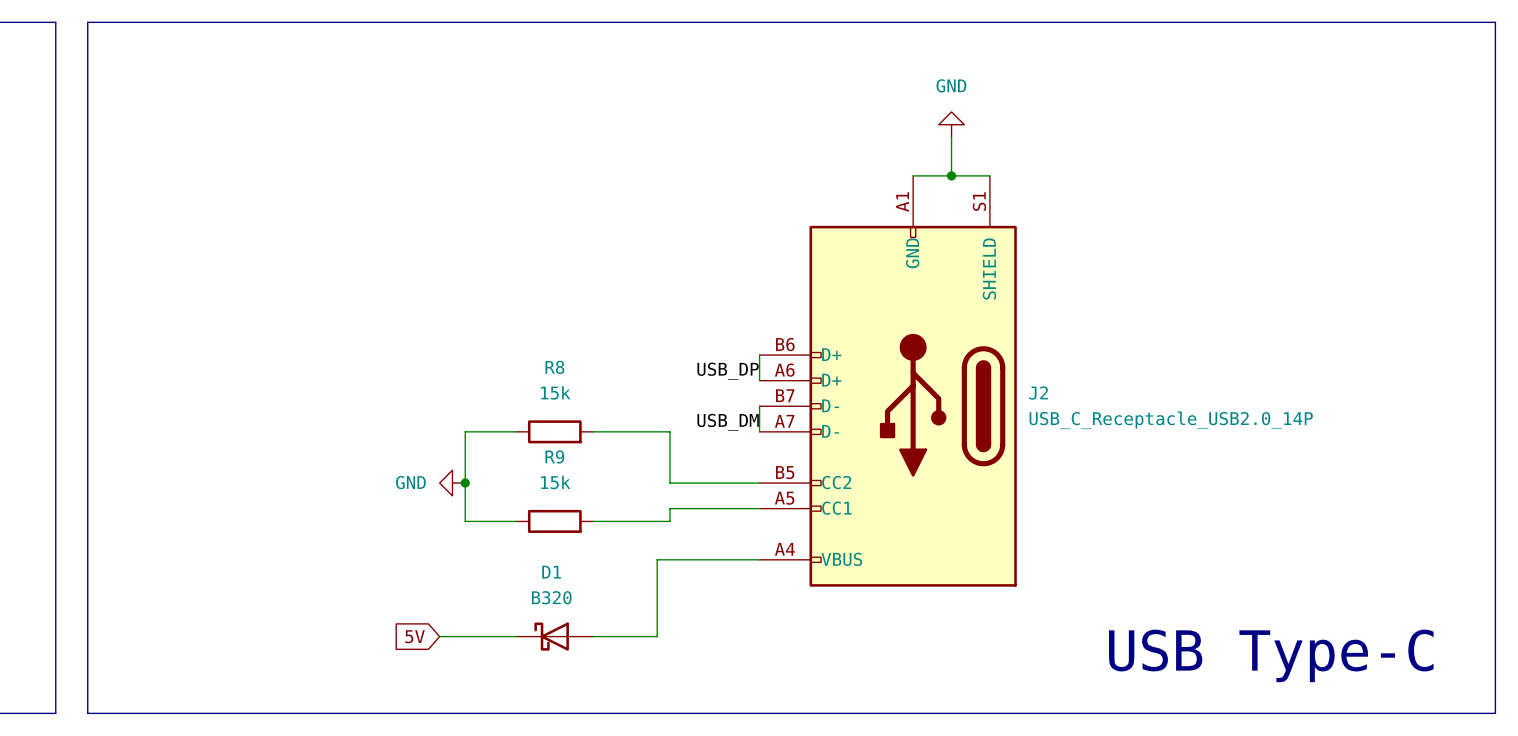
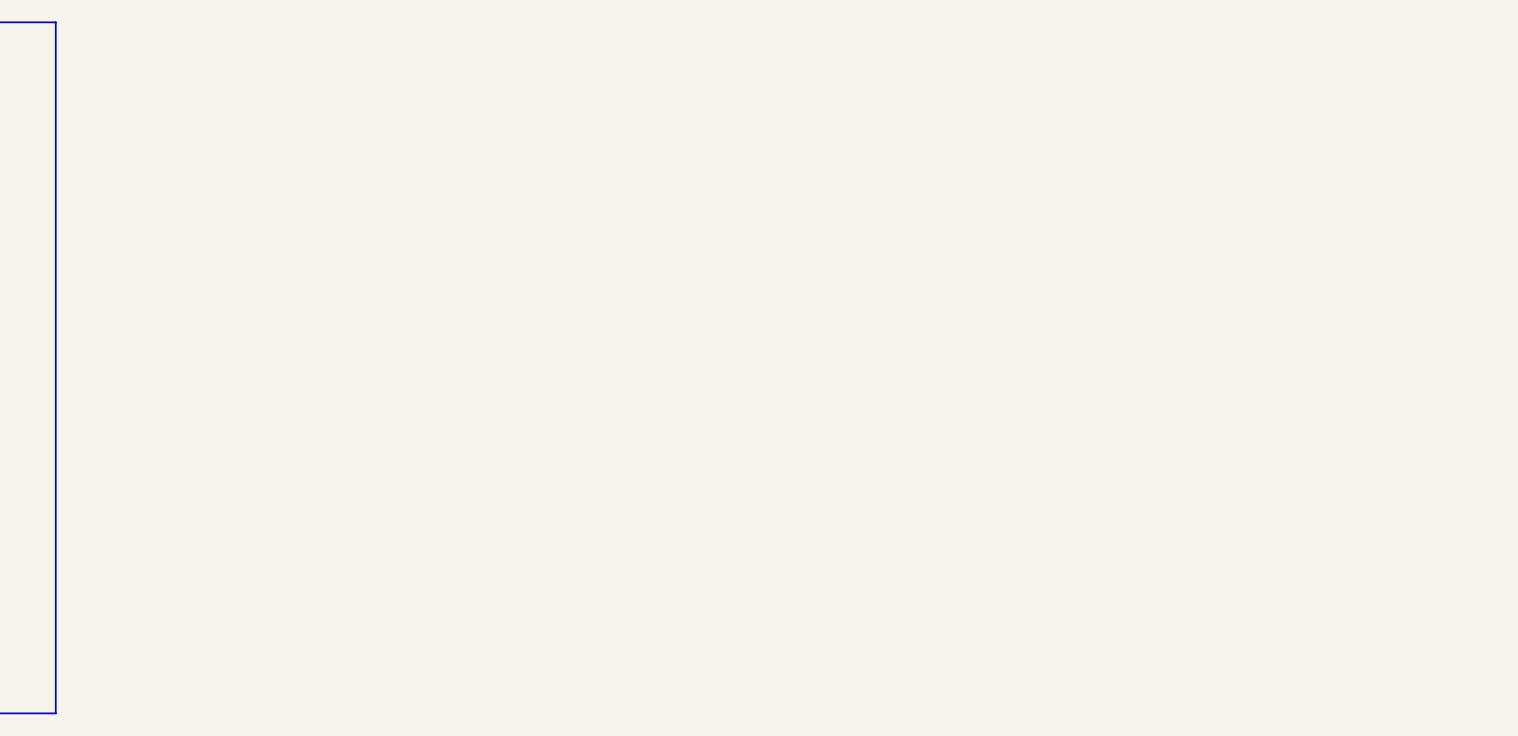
line: (87, 22) (1495, 22) (1495, 713) (87, 713) (87, 22) -> none
power symbol: GND (951, 124) -> none
wire: (951, 137) (951, 175) -> none
wire: (913, 175) (989, 175) -> none
junction: (951, 175) -> none
wire: (759, 355) (759, 380) -> none
label: USB_DP (728, 371) -> none
J2: USB_C_Receptacle_USB2.0_14P (888, 381) -> none
wire: (759, 406) (759, 431) -> none
label: USB_DM (728, 422) -> none
wire: (516, 431) (465, 431) (465, 521) (516, 521) -> none
R8: 15k (554, 431) -> none
wire: (593, 431) (670, 431) (670, 483) (759, 483) -> none
power symbol: GND (452, 483) -> none
junction: (465, 483) -> none
wire: (759, 508) (670, 508) (670, 521) (593, 521) -> none
R9: 15k (554, 521) -> none
wire: (759, 559) (657, 559) (657, 636) (593, 636) -> none
global label: 5V (415, 636) -> none
wire: (439, 636) (516, 636) -> none
D1: B320 (554, 636) -> none
text: USB Type-C (1271, 655) -> none

